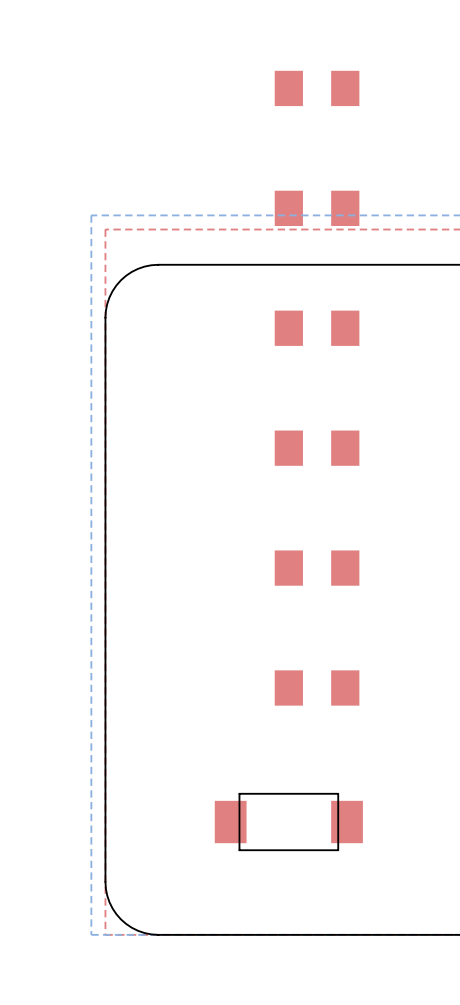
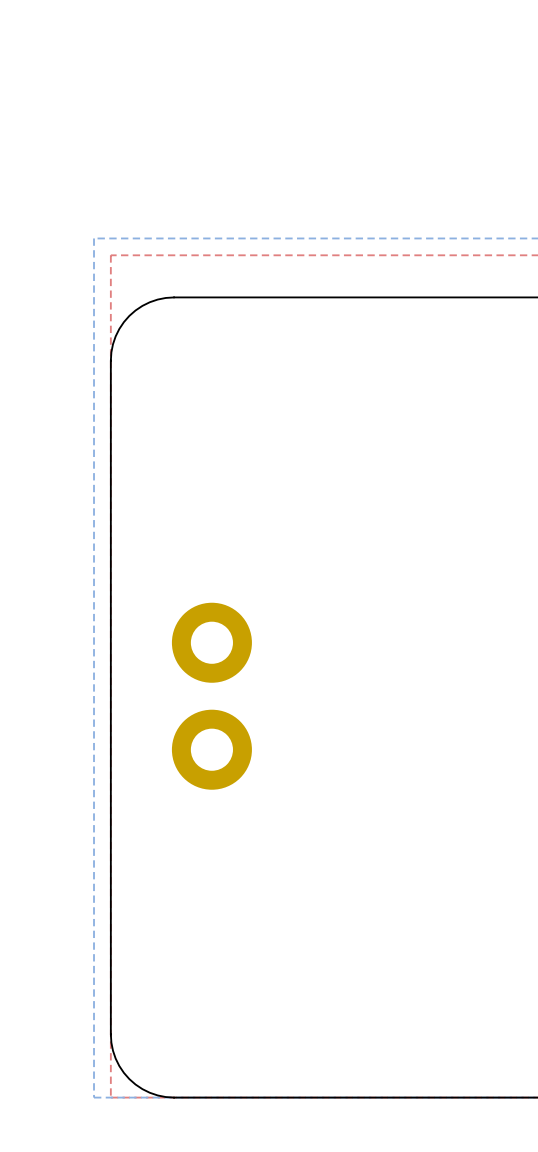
part: (317, 88) -> none
part: (317, 208) -> none
part: (317, 328) -> none
part: (317, 448) -> none
part: (317, 568) -> none
part: none -> (211, 696)
part: (317, 687) -> none
part: (288, 822) -> none

